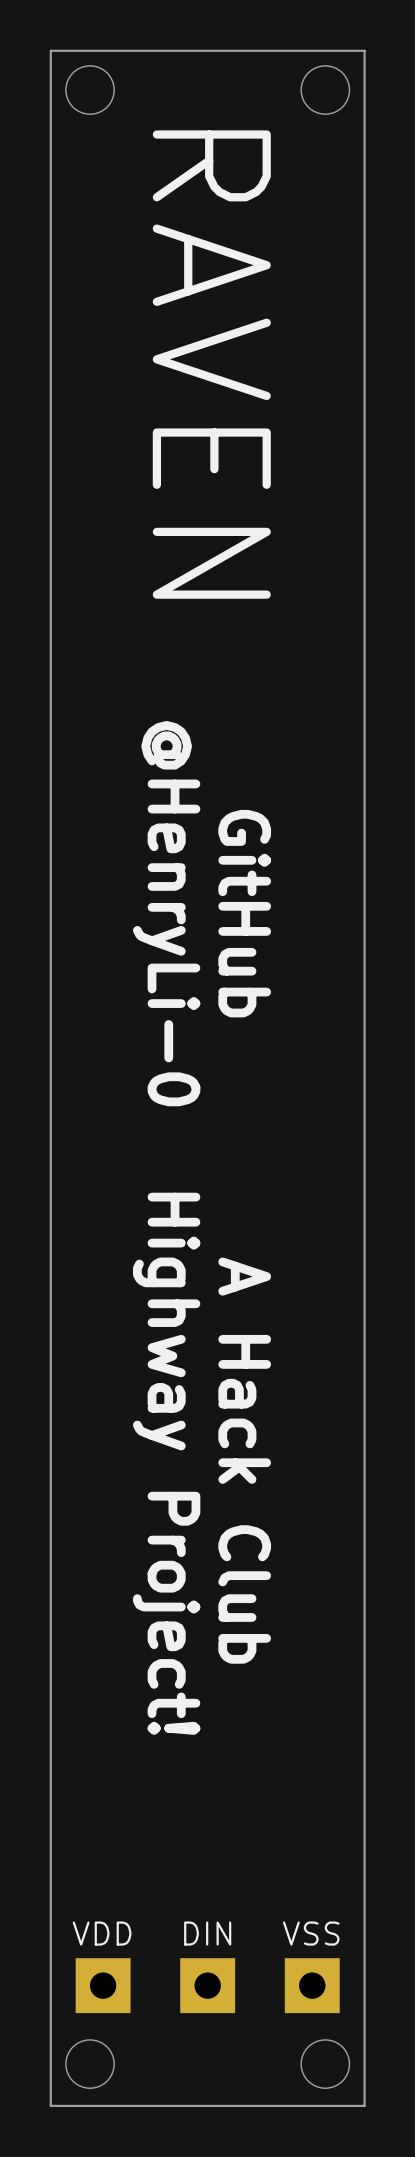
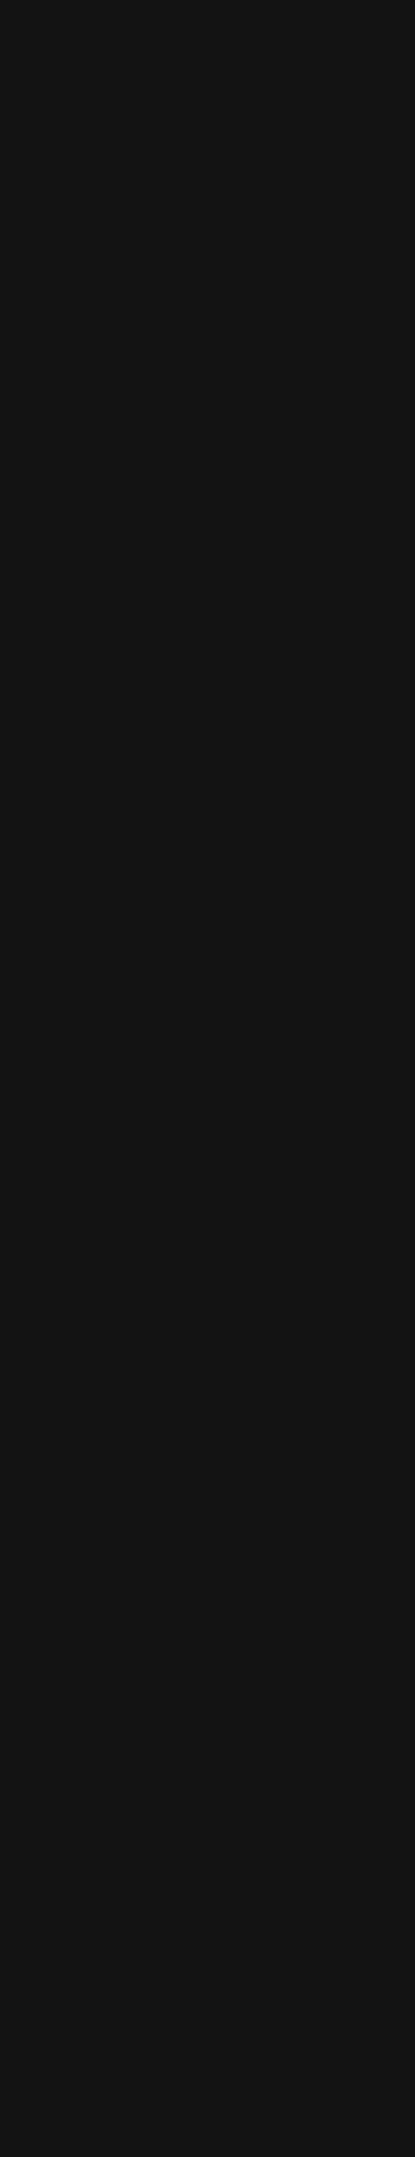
board edge: (364, 50) (50, 50) (50, 2105) (364, 2105) (364, 50) -> none
round board edge: [65, 65, 115, 115] -> none
round board edge: [300, 65, 351, 115] -> none
text: RAVEN (211, 364) -> none
text: @HenryLi-0 (166, 913) -> none
text: GitHub (244, 913) -> none
text: A Hack Club (244, 1460) -> none
text: Highway Project! (166, 1463) -> none
text: VDD (102, 1933) -> none
text: DIN (207, 1933) -> none
text: VSS (311, 1933) -> none
part: (103, 1985) -> none
part: (207, 1985) -> none
part: (312, 1985) -> none
round board edge: [65, 2039, 115, 2089] -> none
round board edge: [300, 2039, 351, 2089] -> none

